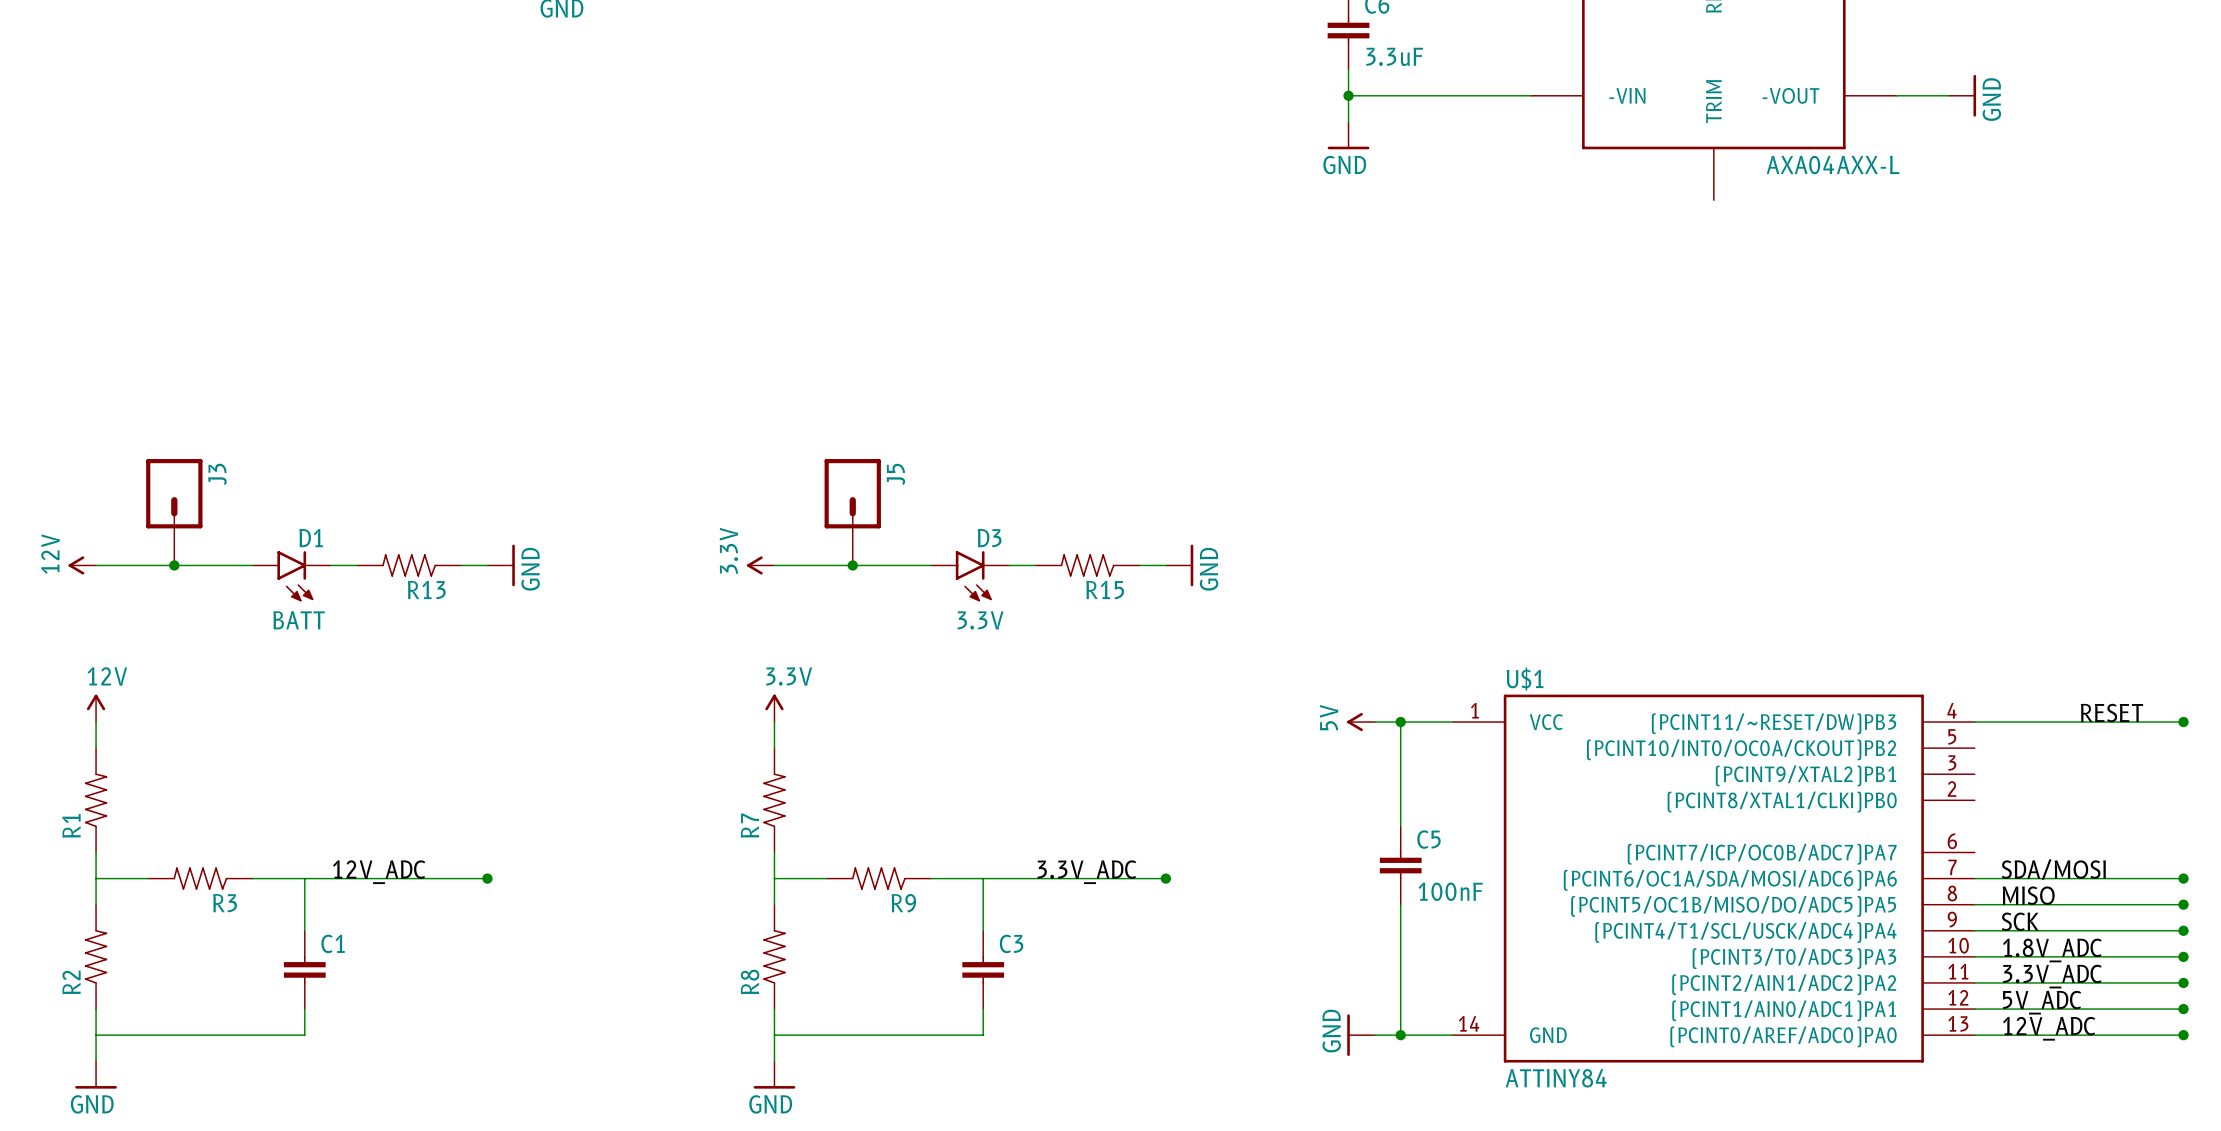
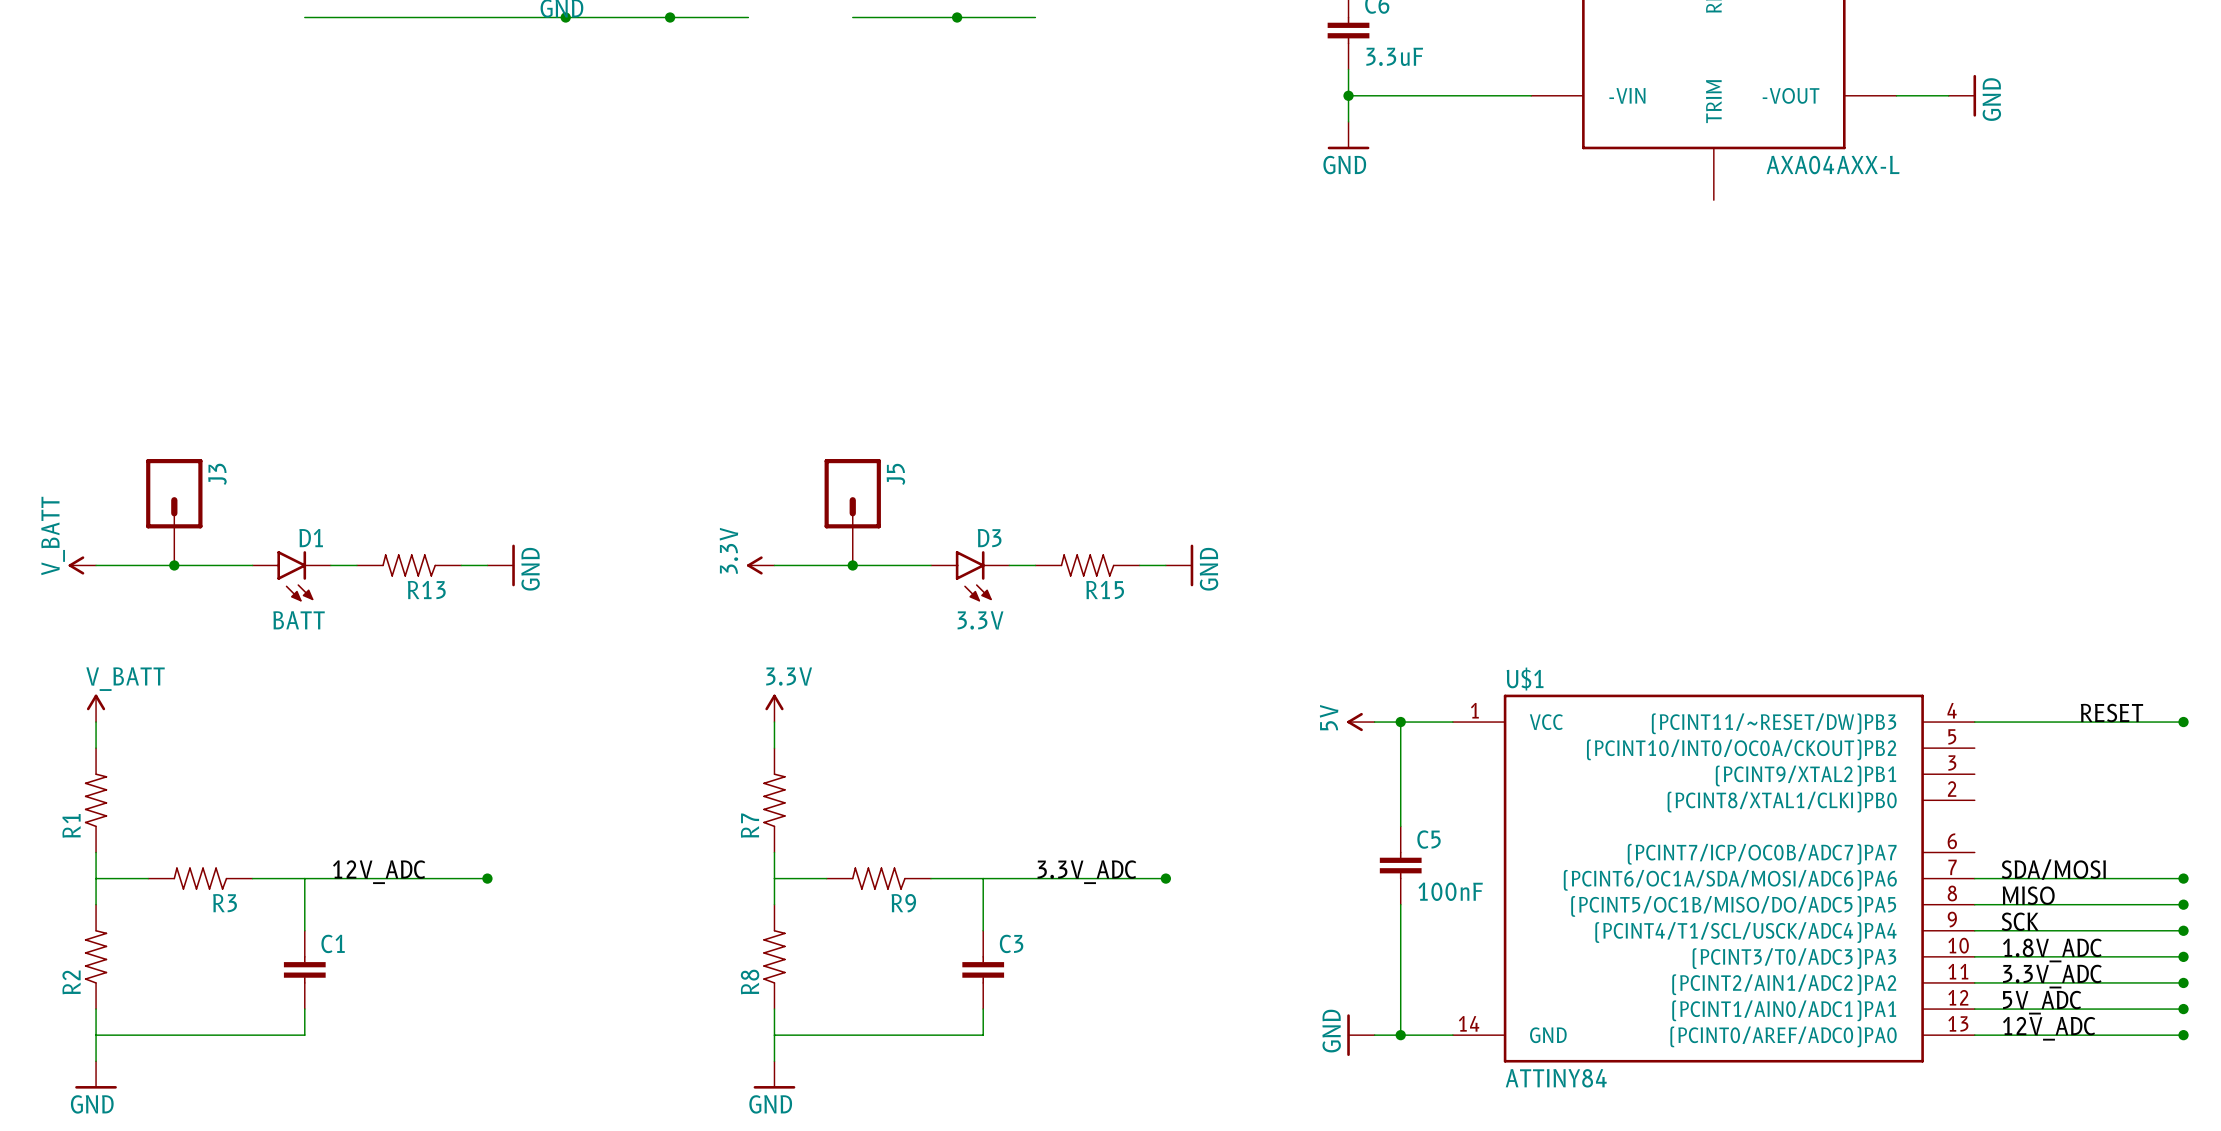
wire: none -> (304, 17) (748, 17)
junction: none -> (565, 17)
junction: none -> (670, 17)
wire: none -> (852, 17) (1035, 17)
junction: none -> (957, 17)
power symbol: 12V (82, 565) -> V_BATT (82, 565)
power symbol: 12V (96, 708) -> V_BATT (96, 708)

